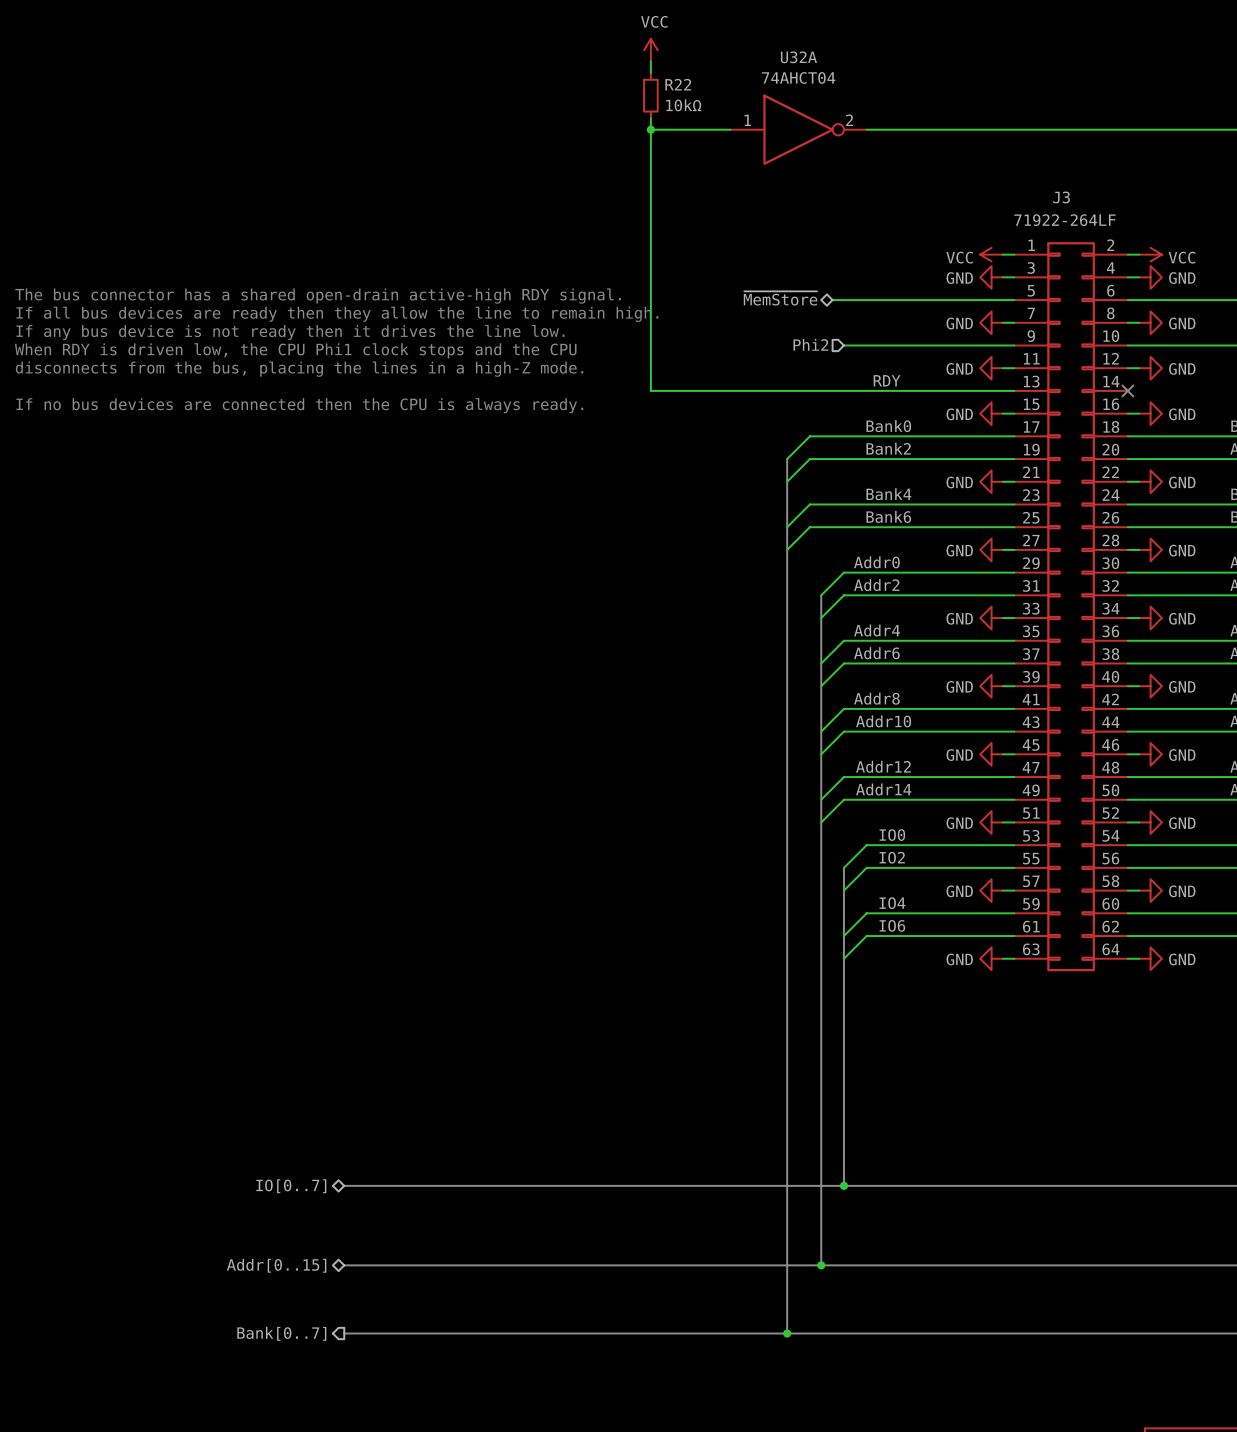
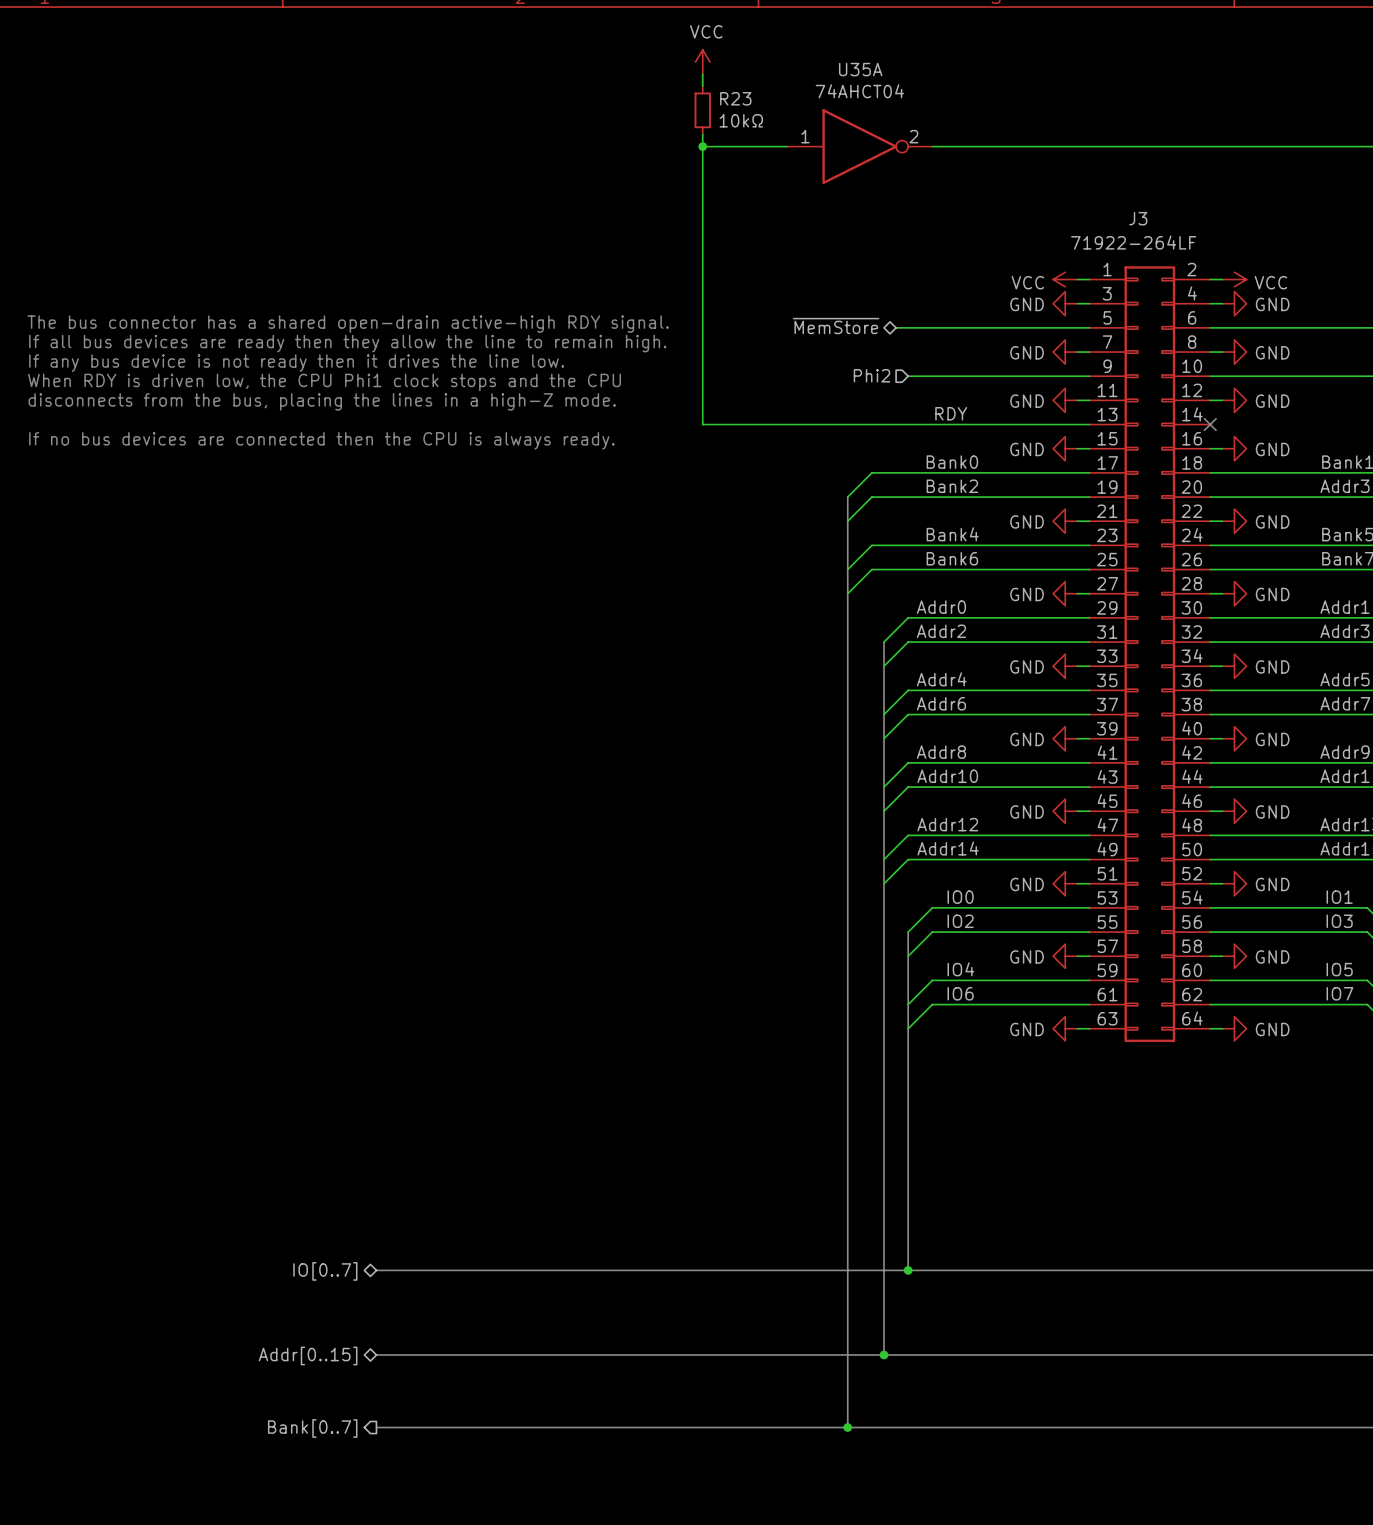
U32A name: U32A (798, 57) -> U35A (860, 69)
R22 name: R22 (678, 84) -> R23 (735, 98)

